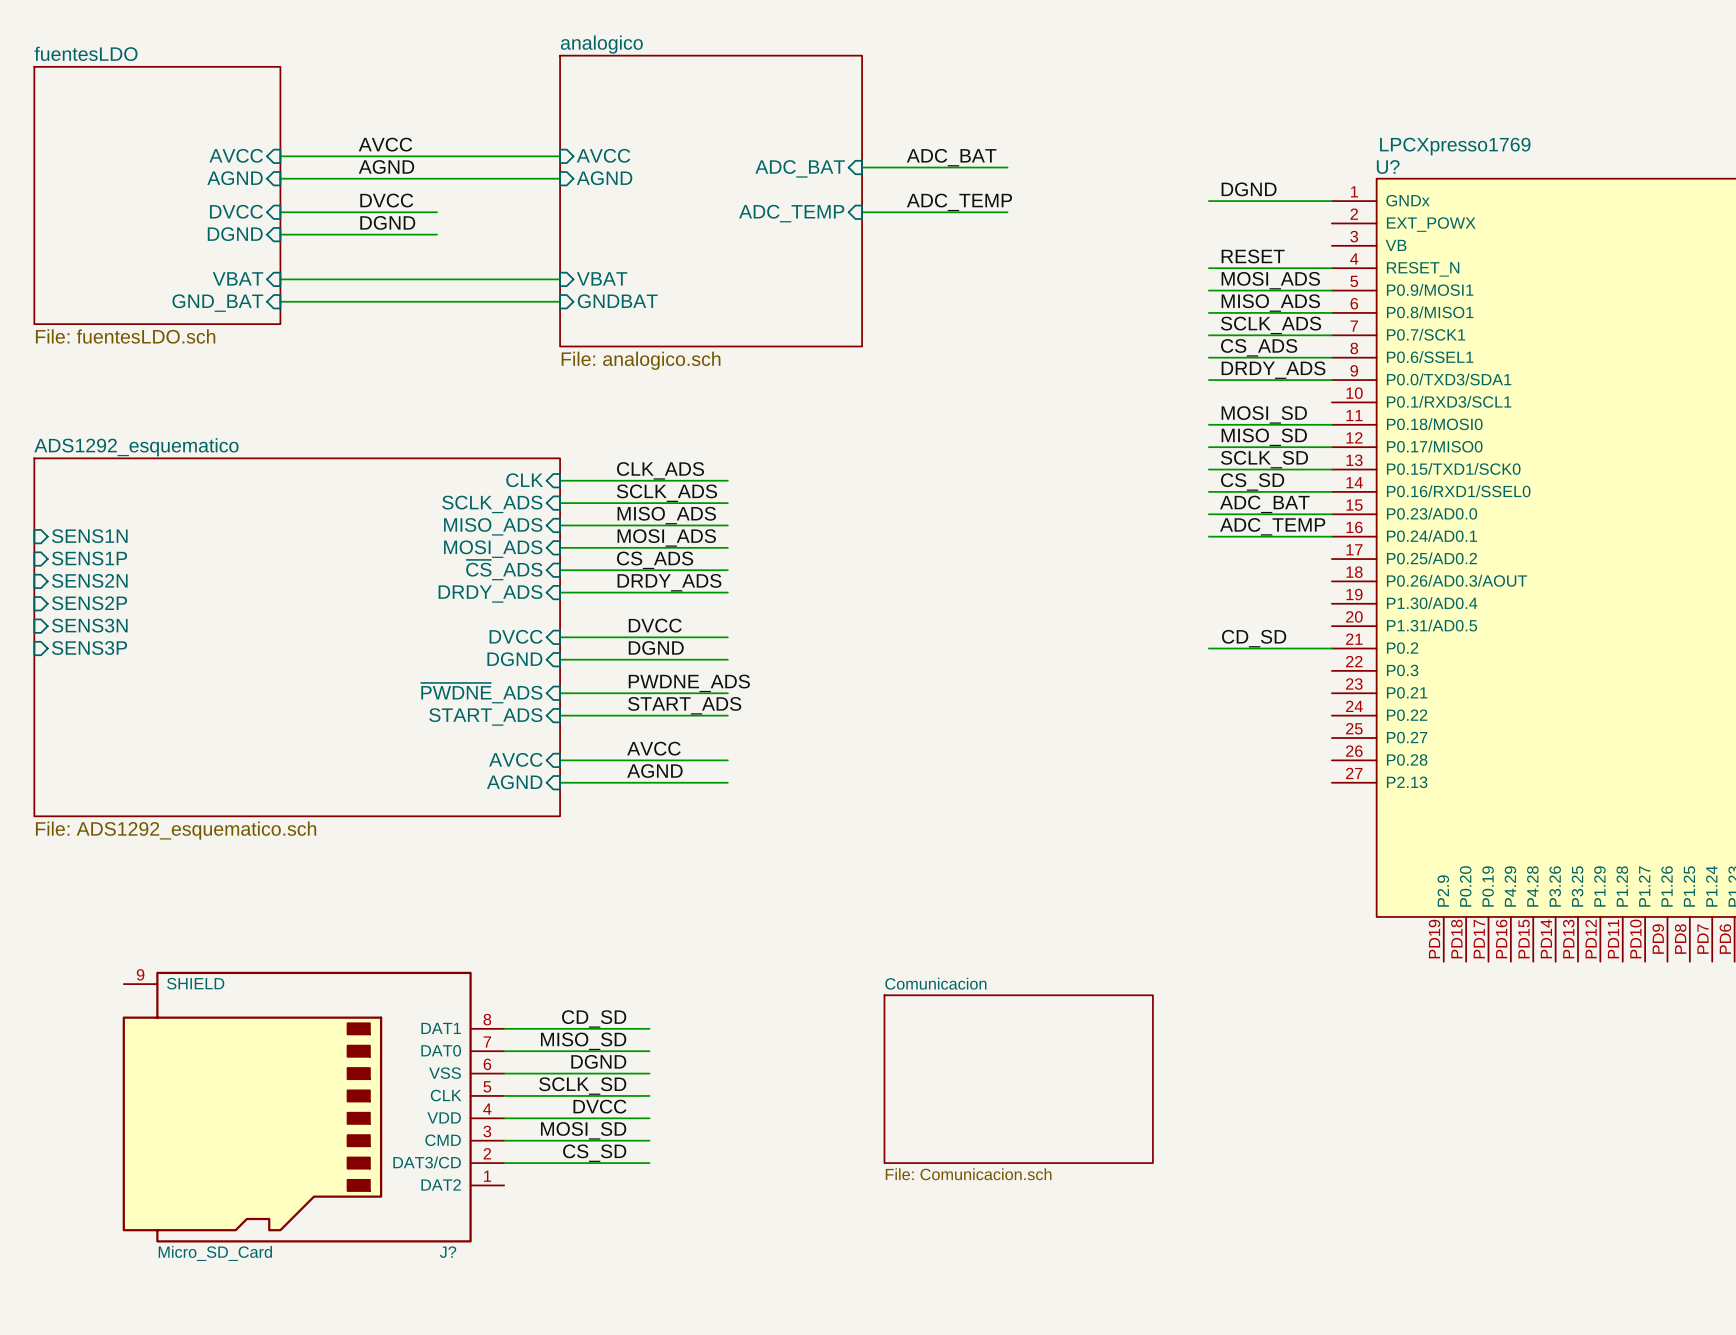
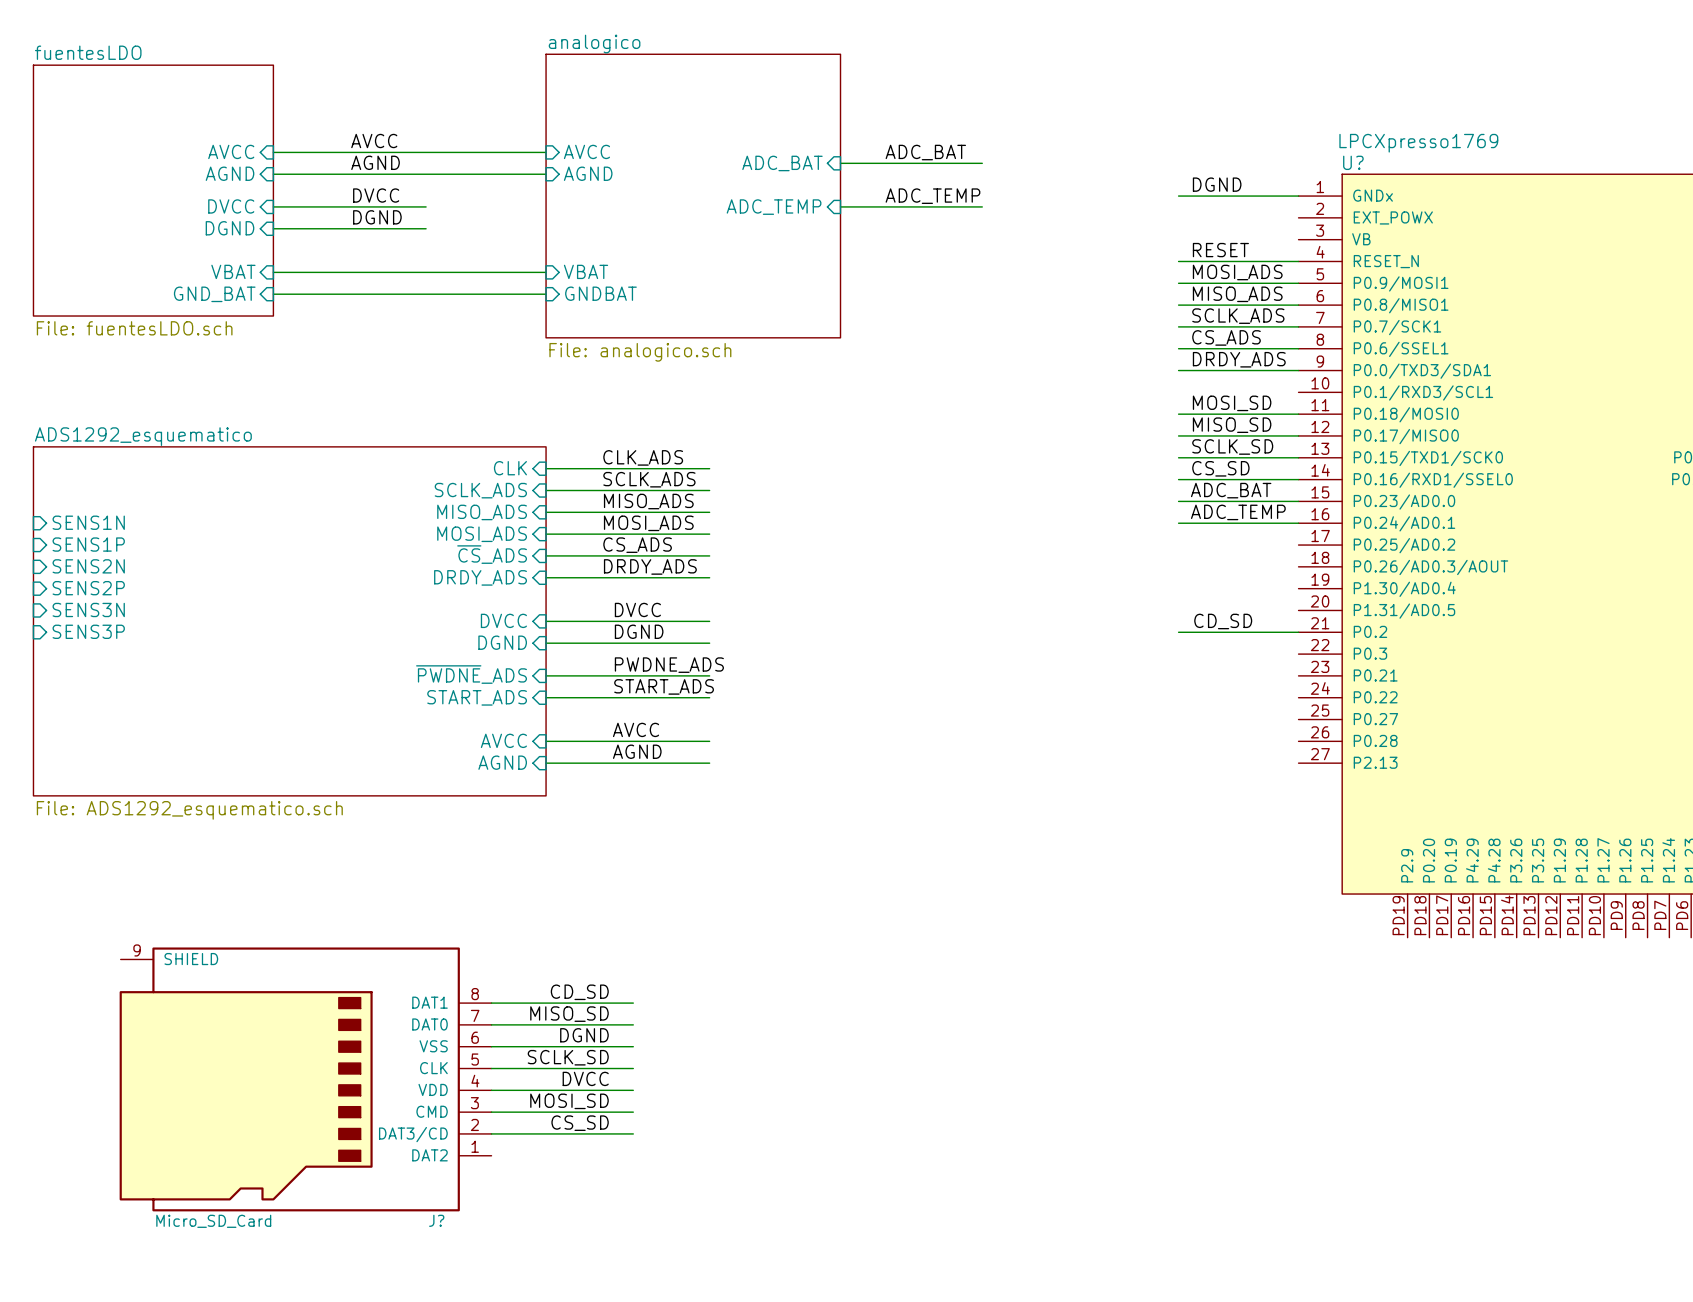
sheet Comunicacion: File: Comunicacion.sch (1018, 1079) -> none

